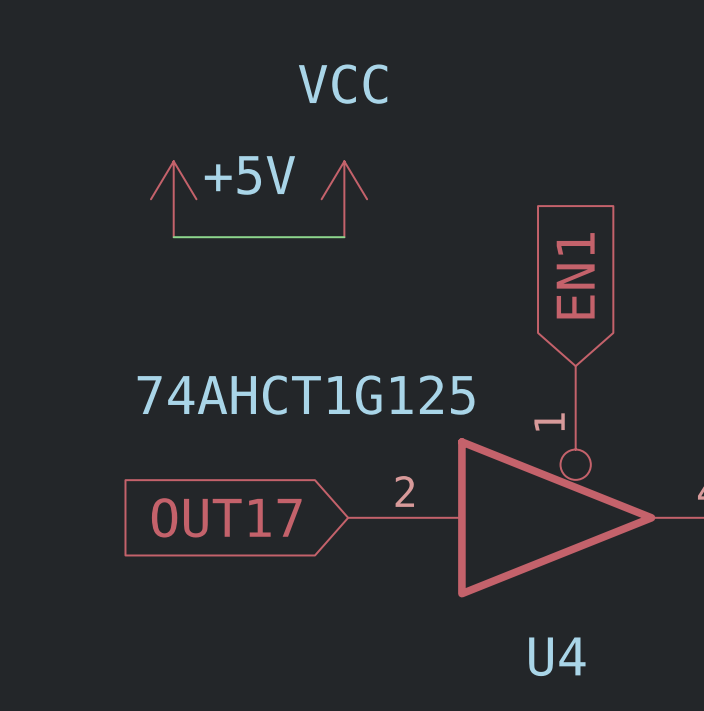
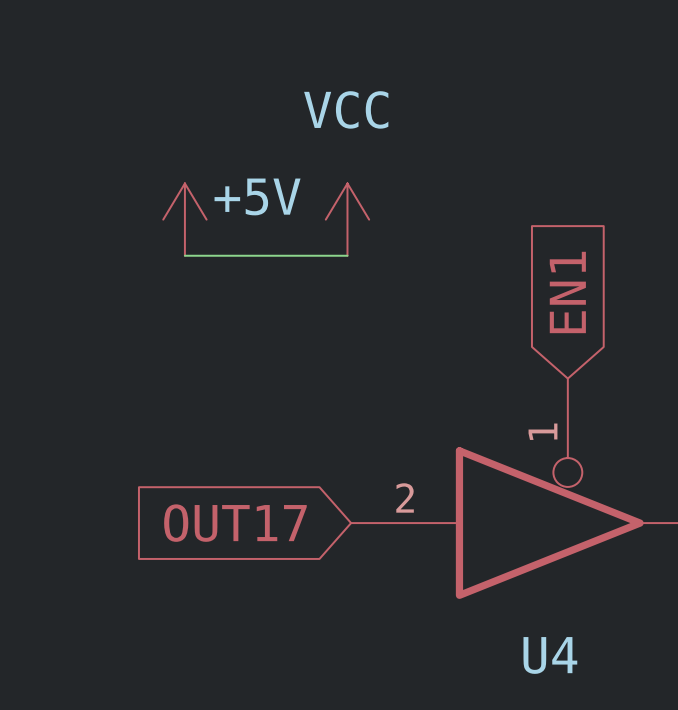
U4 value: 74AHCT1G125 (306, 395) -> none

